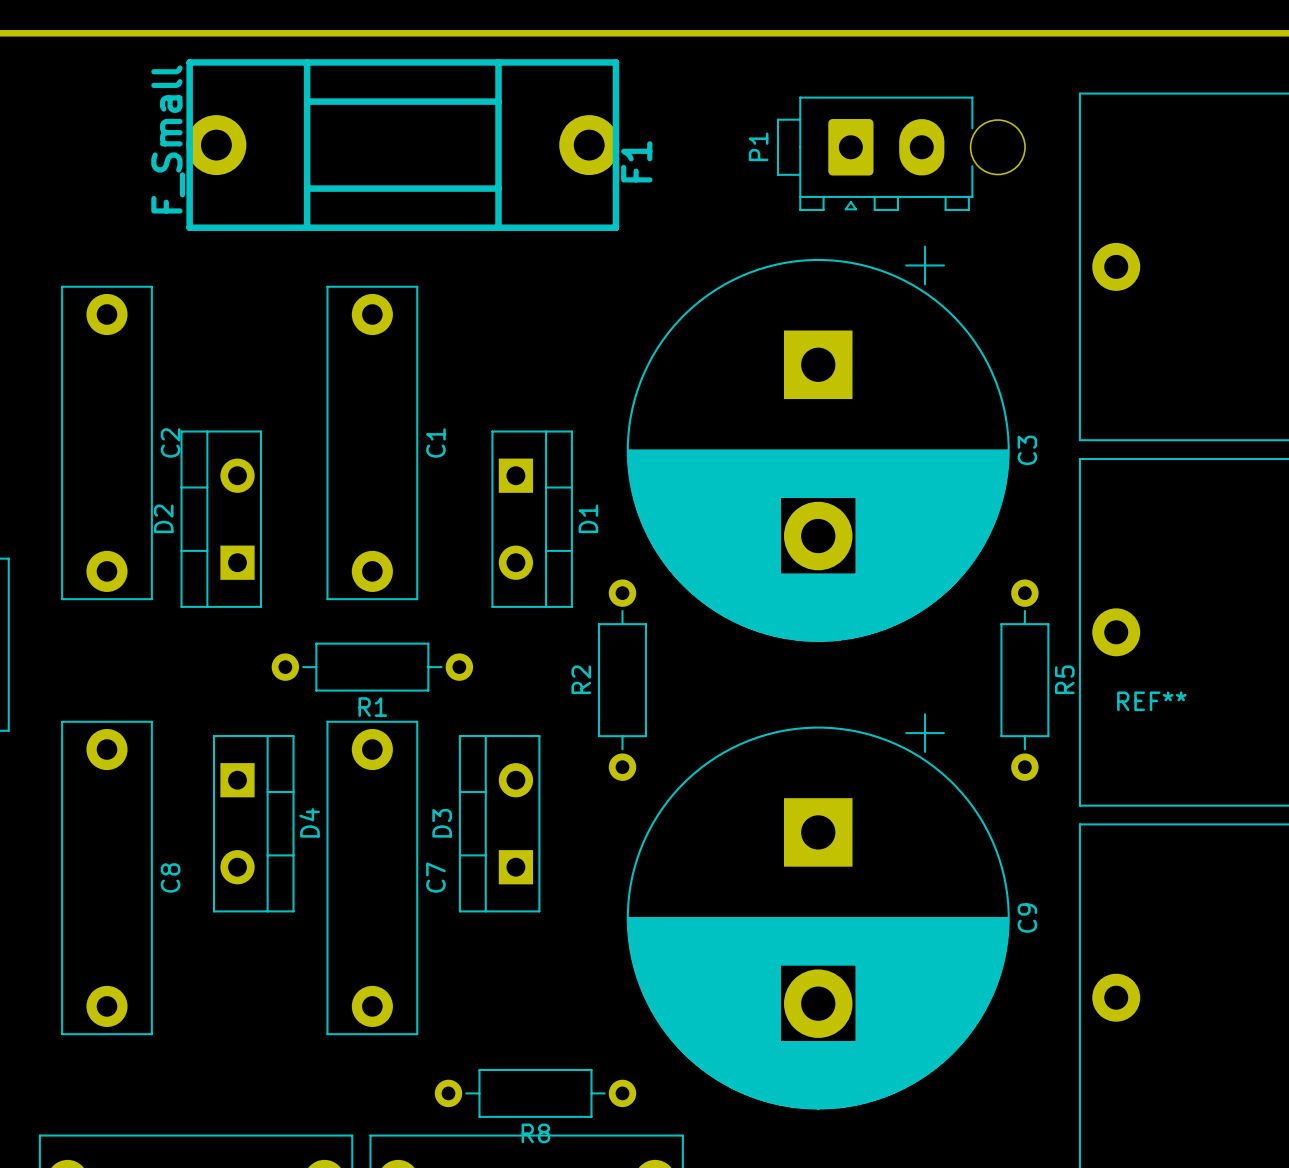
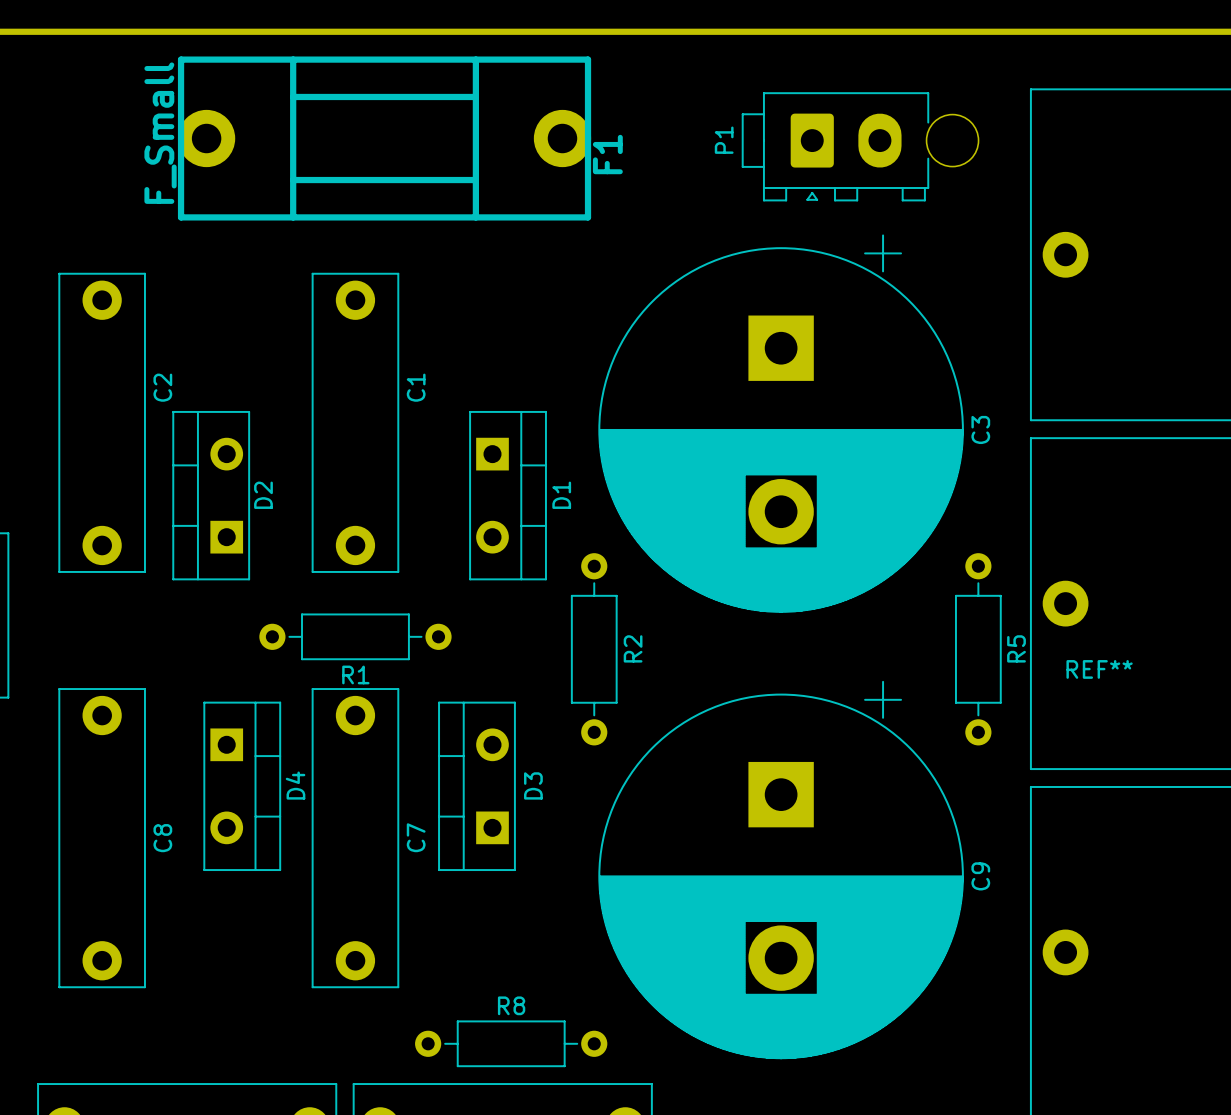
C2 name position: C2 (170, 442) -> C2 (162, 387)
C1 name position: C1 (435, 442) -> C1 (416, 387)
D2 name position: D2 (163, 518) -> D2 (263, 495)
R2 name position: R2 (581, 679) -> R2 (633, 648)
D3 name position: D3 (442, 823) -> D3 (533, 785)
R8 name position: R8 (535, 1133) -> R8 (511, 1005)

